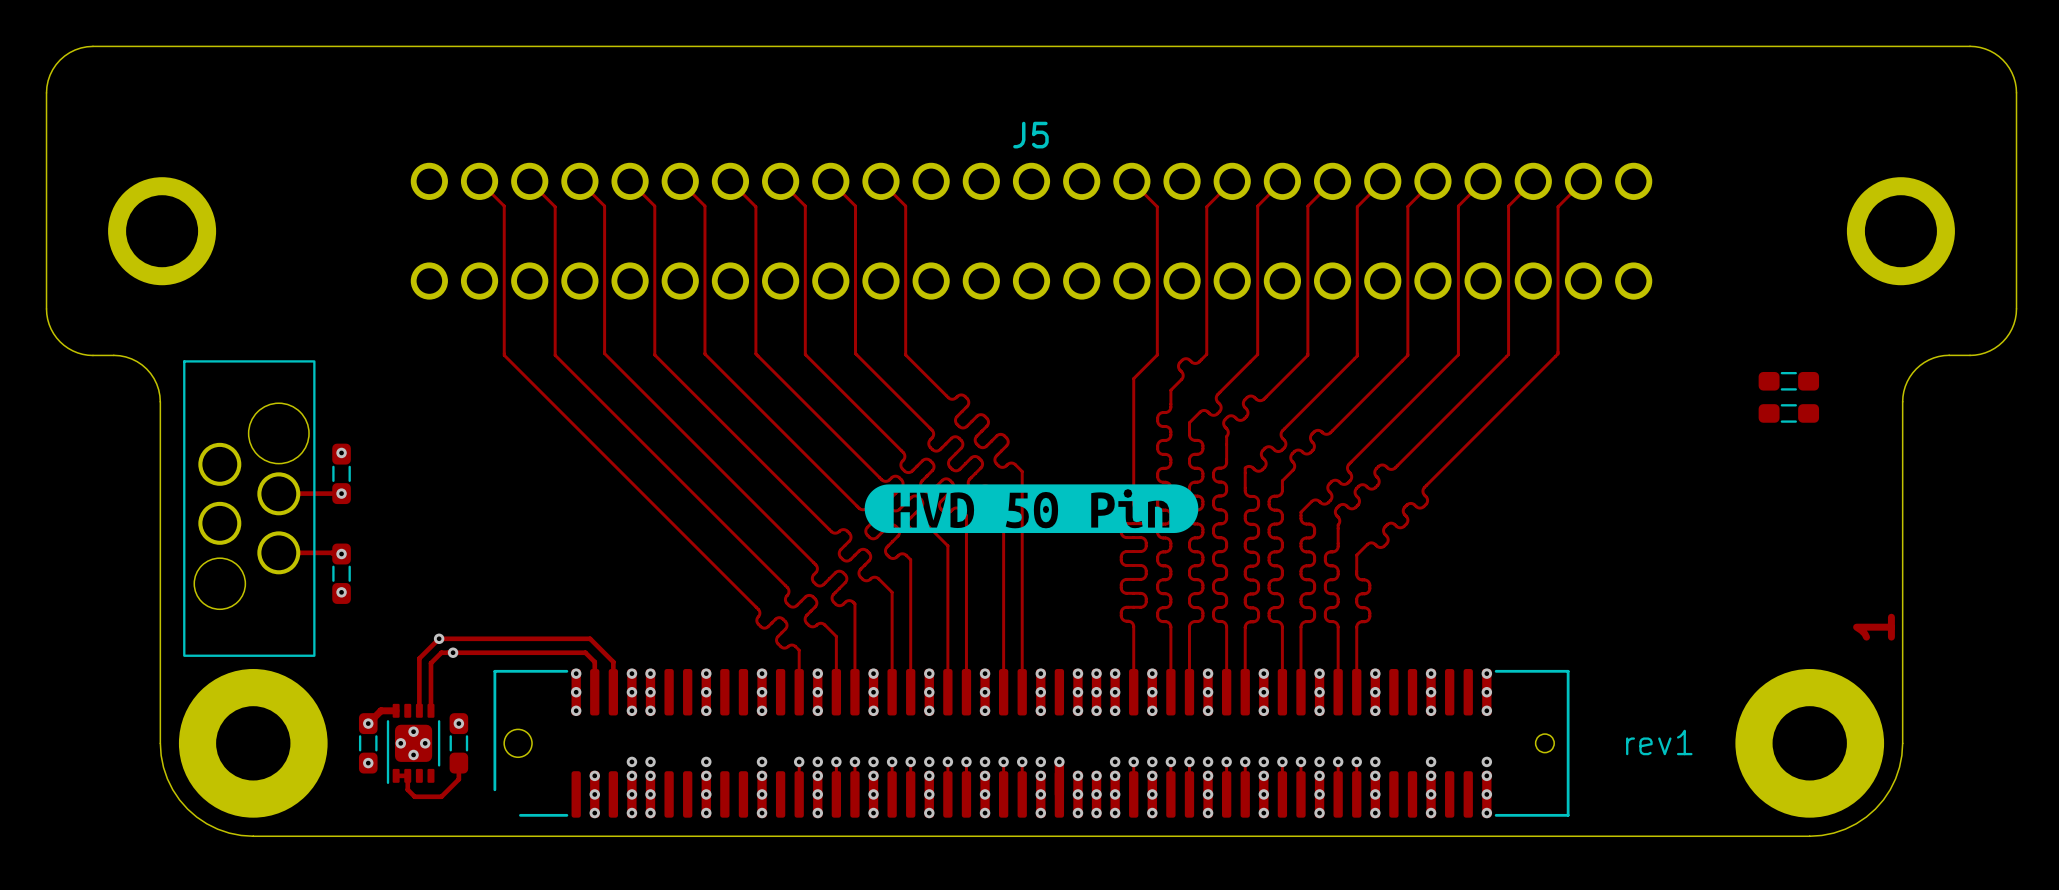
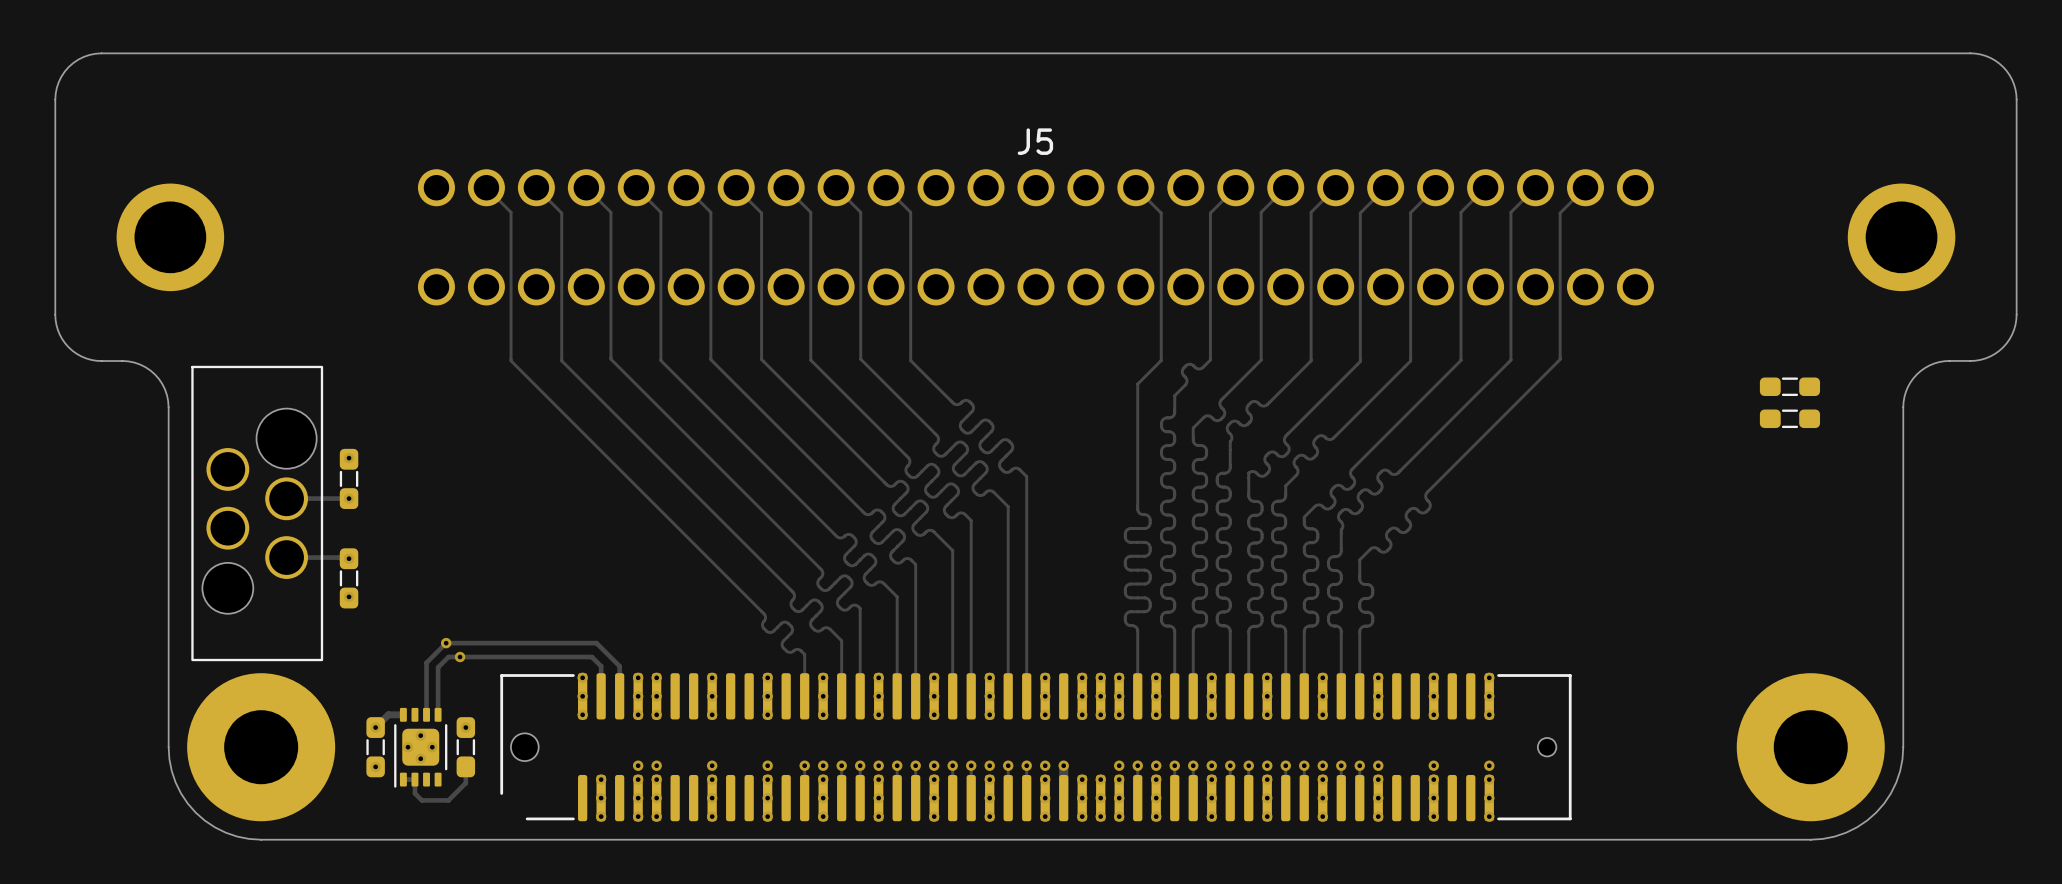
drawing: [864, 484, 1199, 534] -> none
text: 1 (1874, 627) -> none
text: rev1 (1659, 742) -> none

